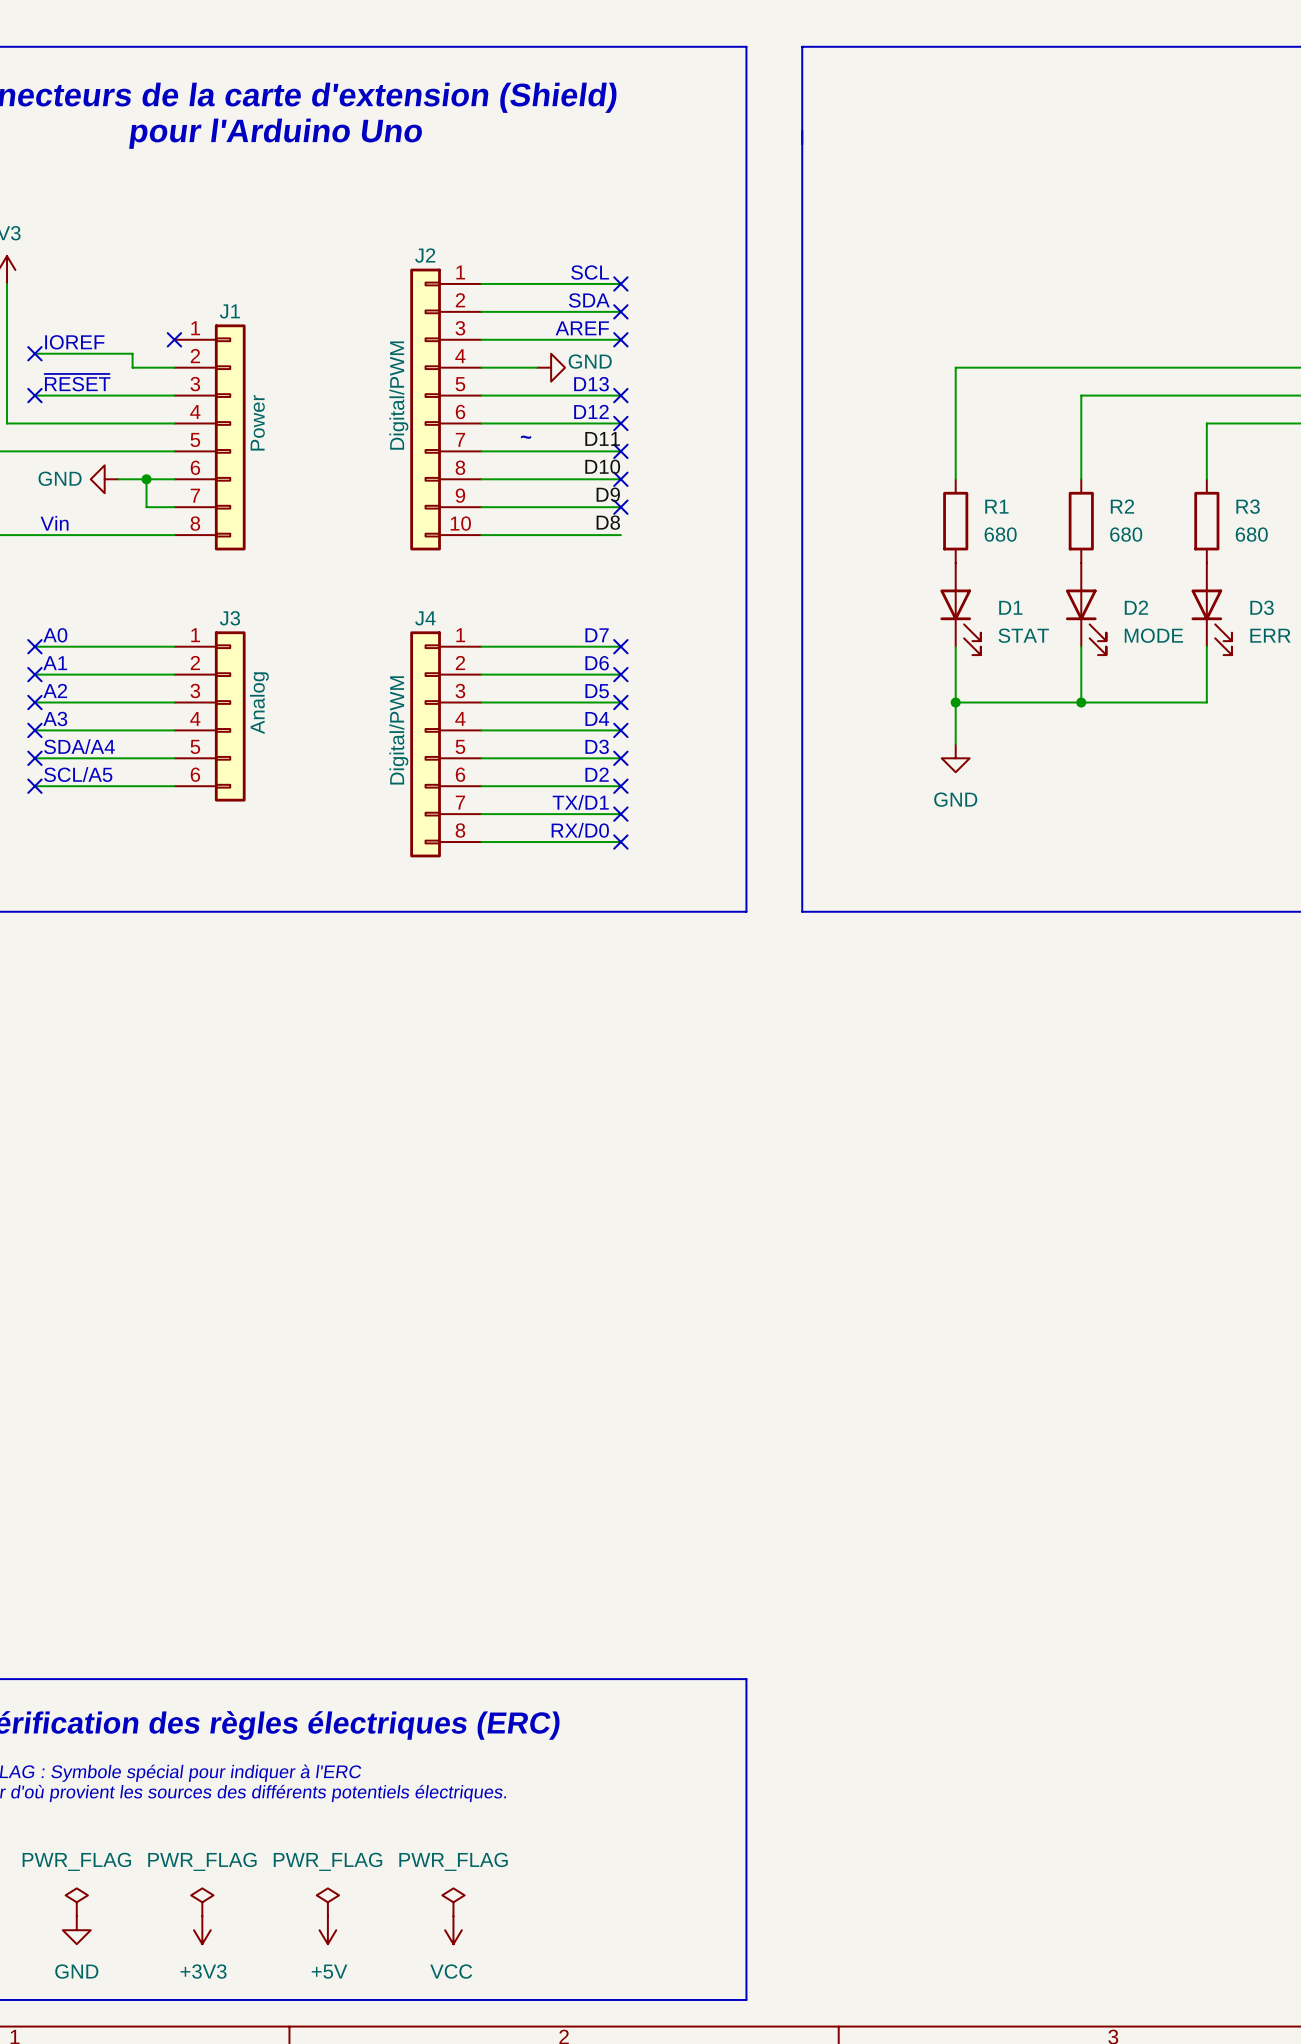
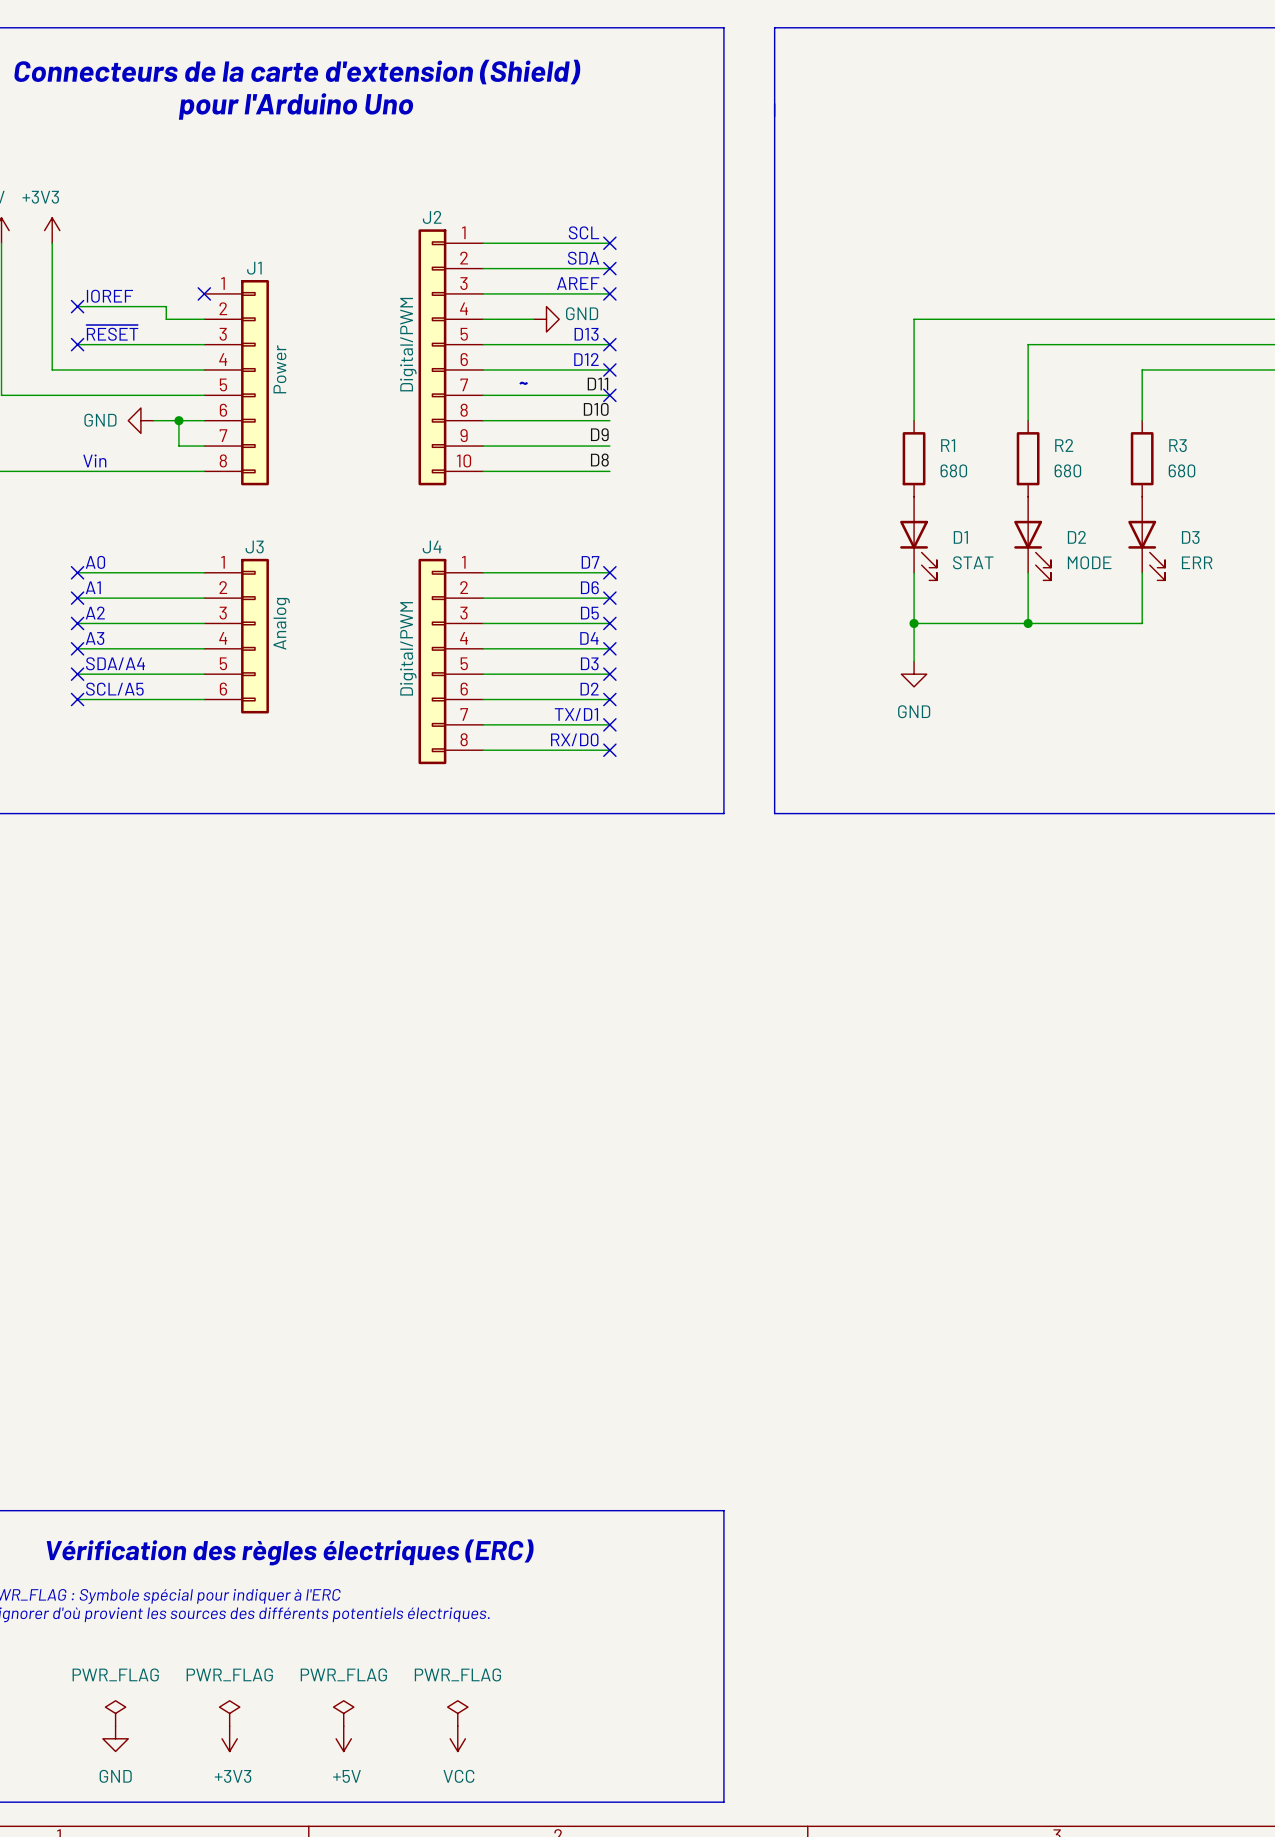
no-connect mark: (620, 479) -> none
no-connect mark: (620, 507) -> none

